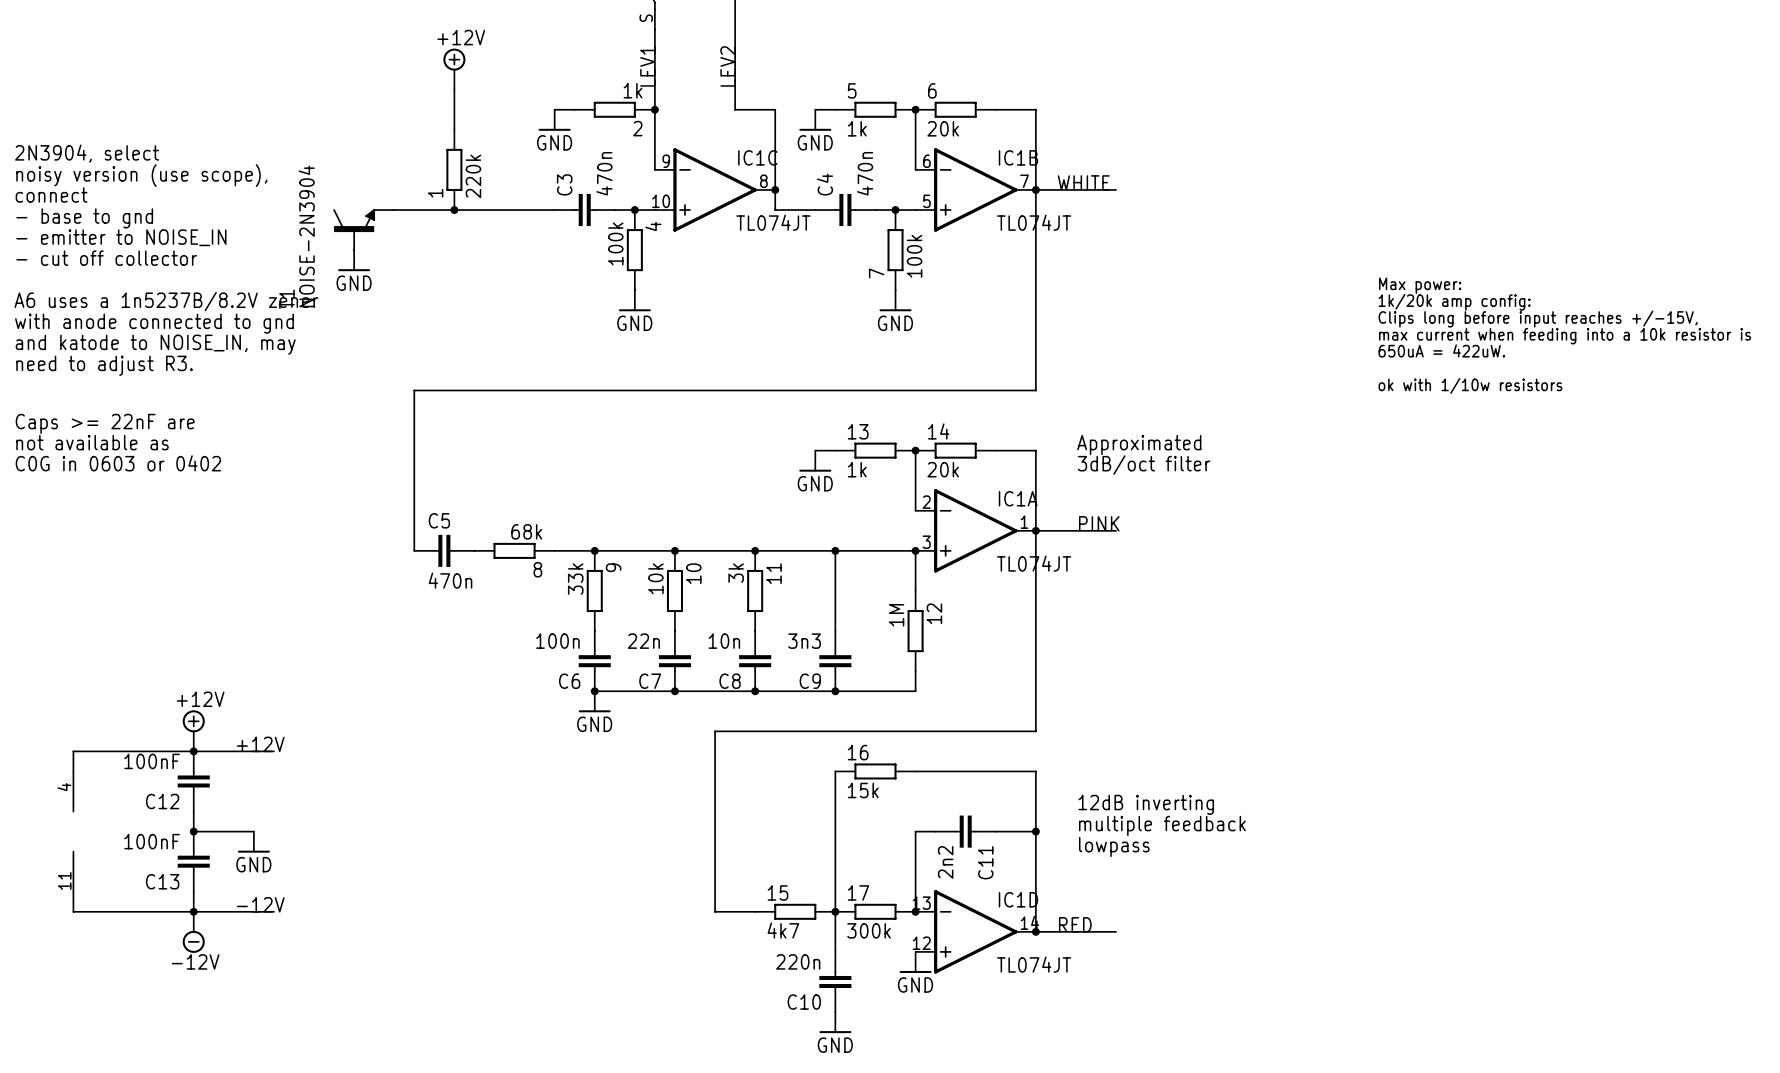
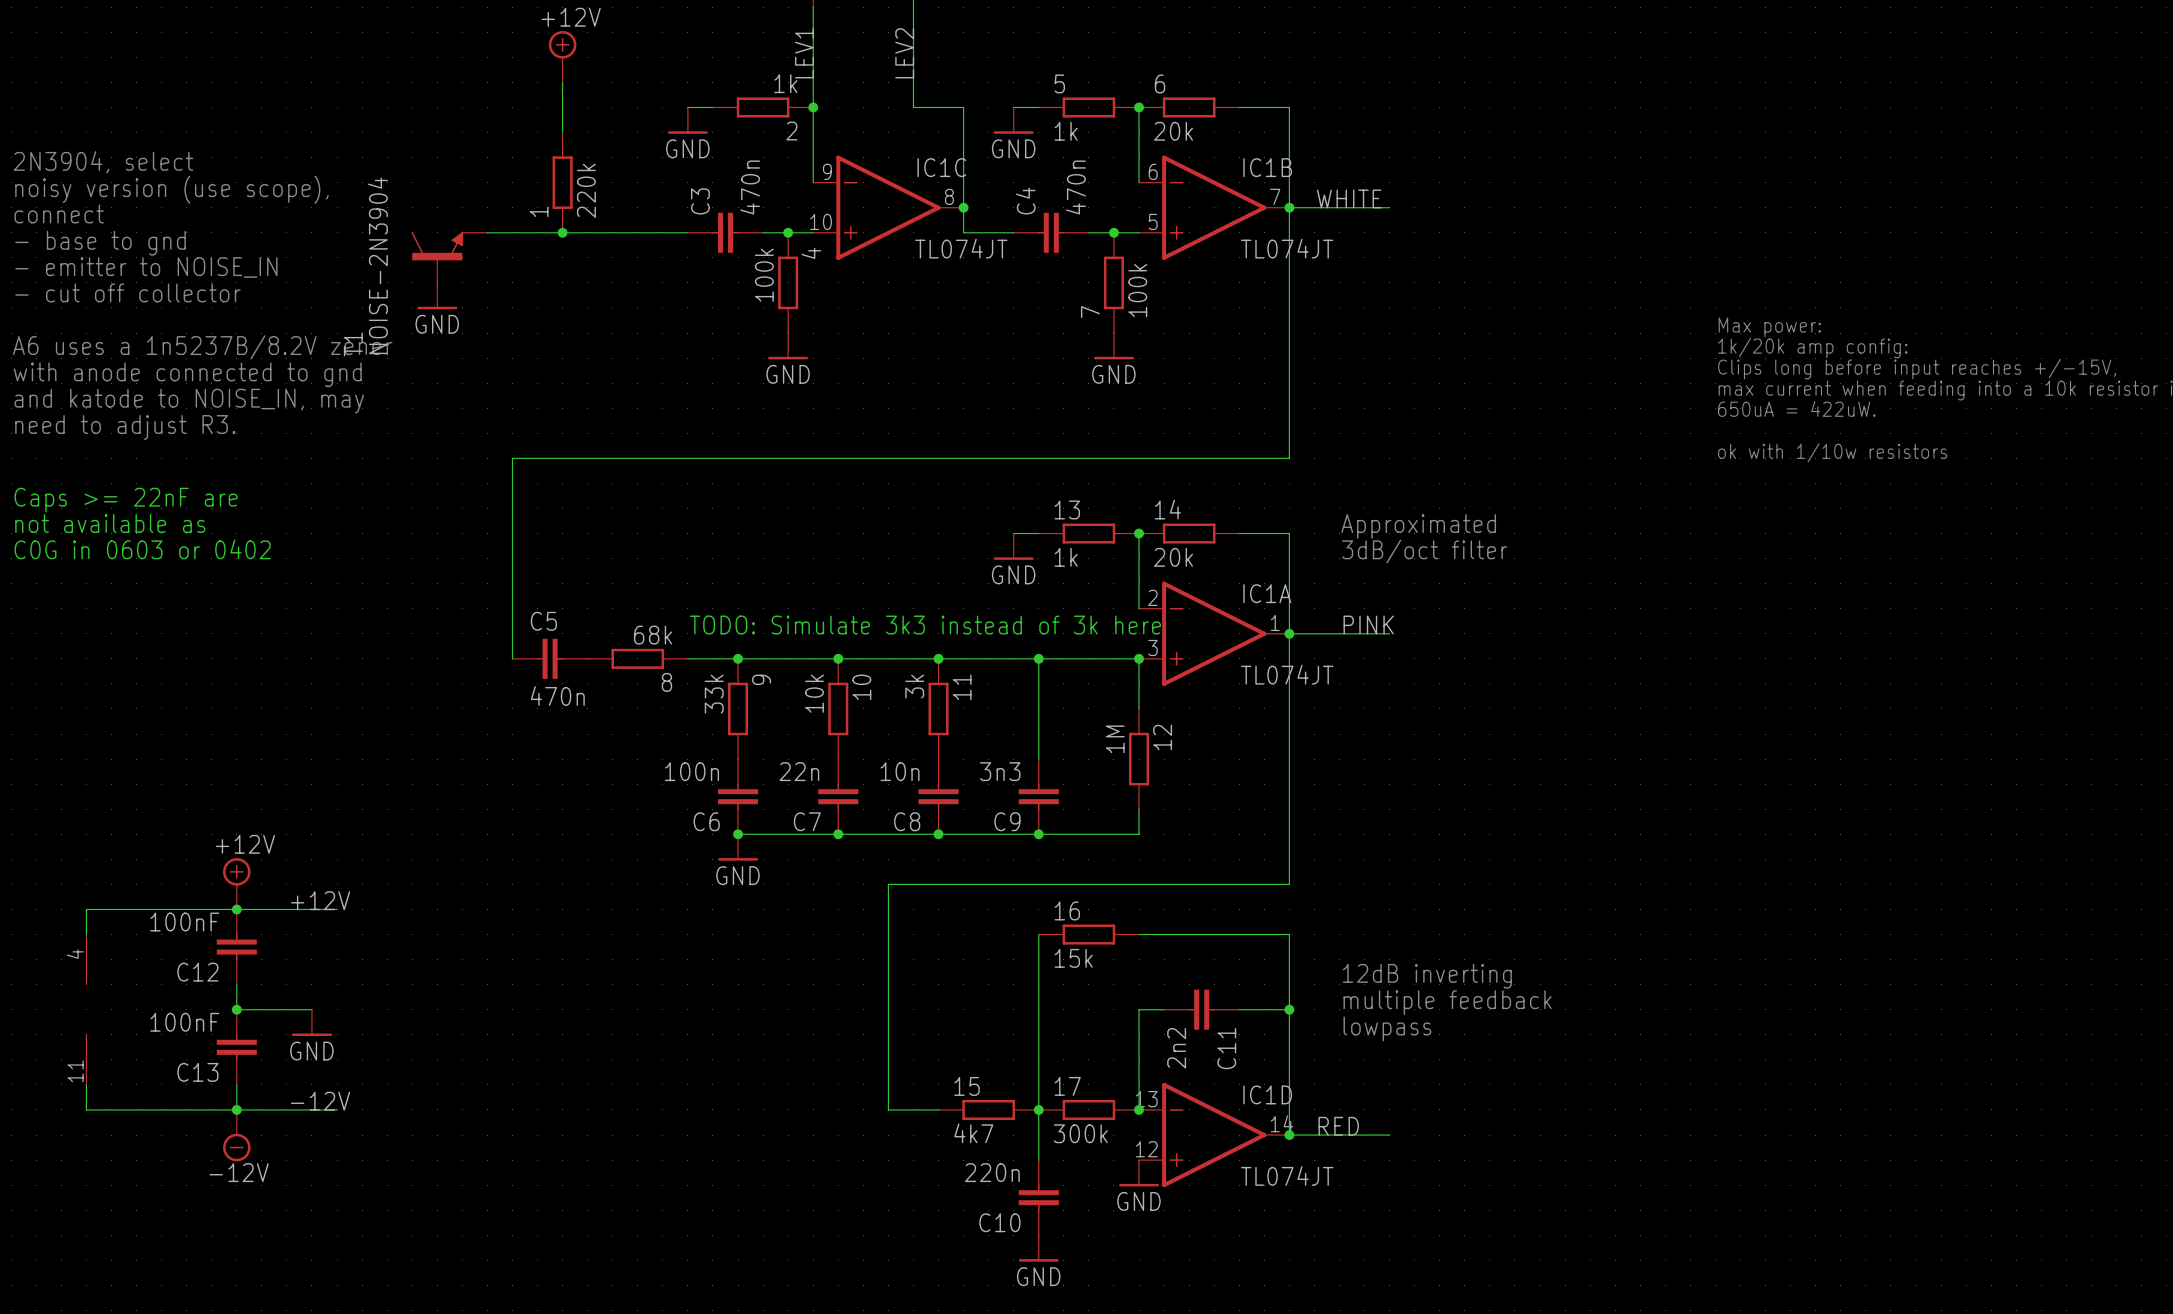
text: none -> TODO: Simulate 3k3 instead of 3k here (925, 625)

